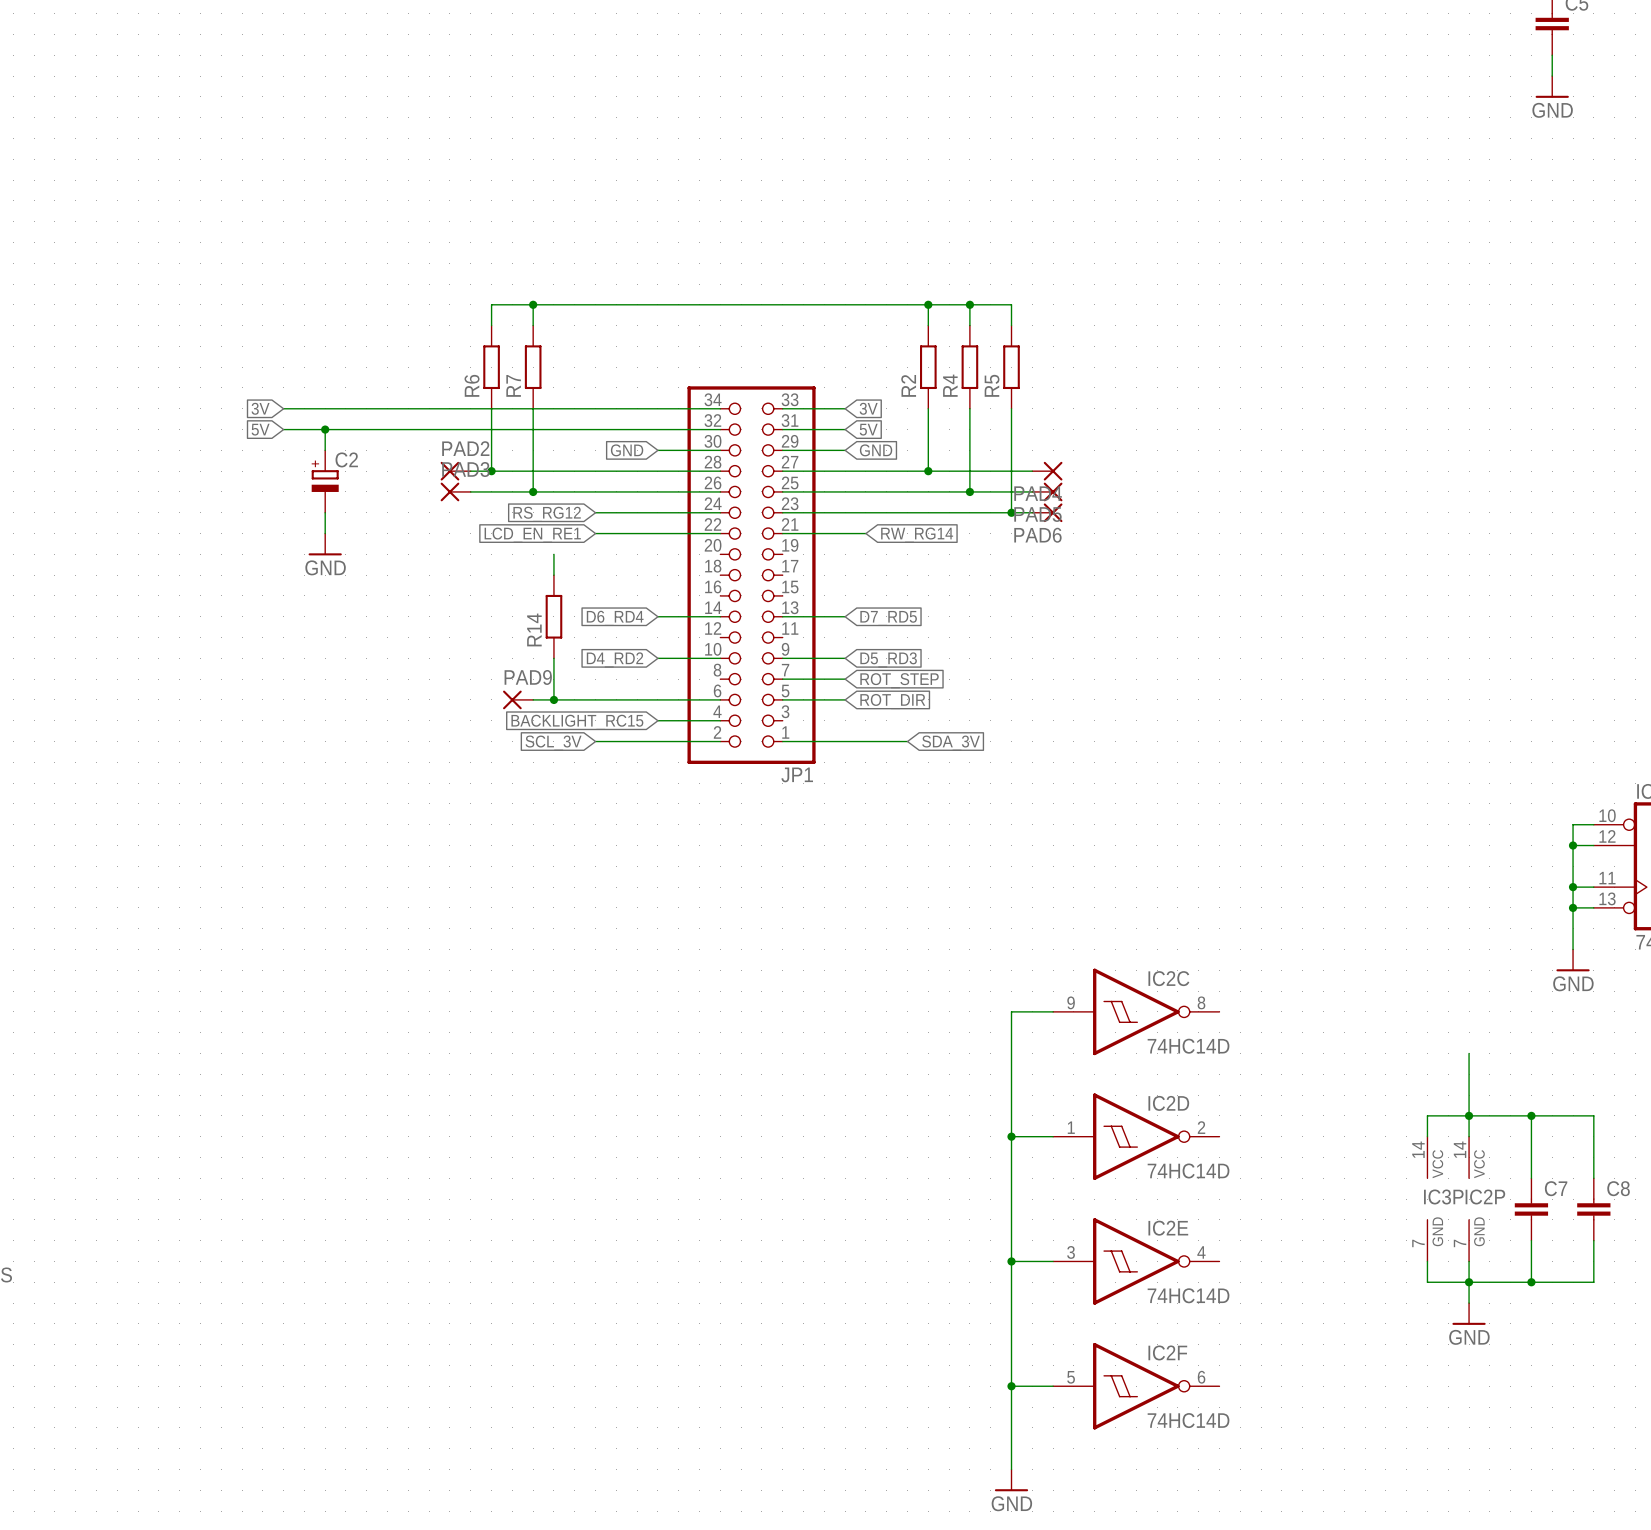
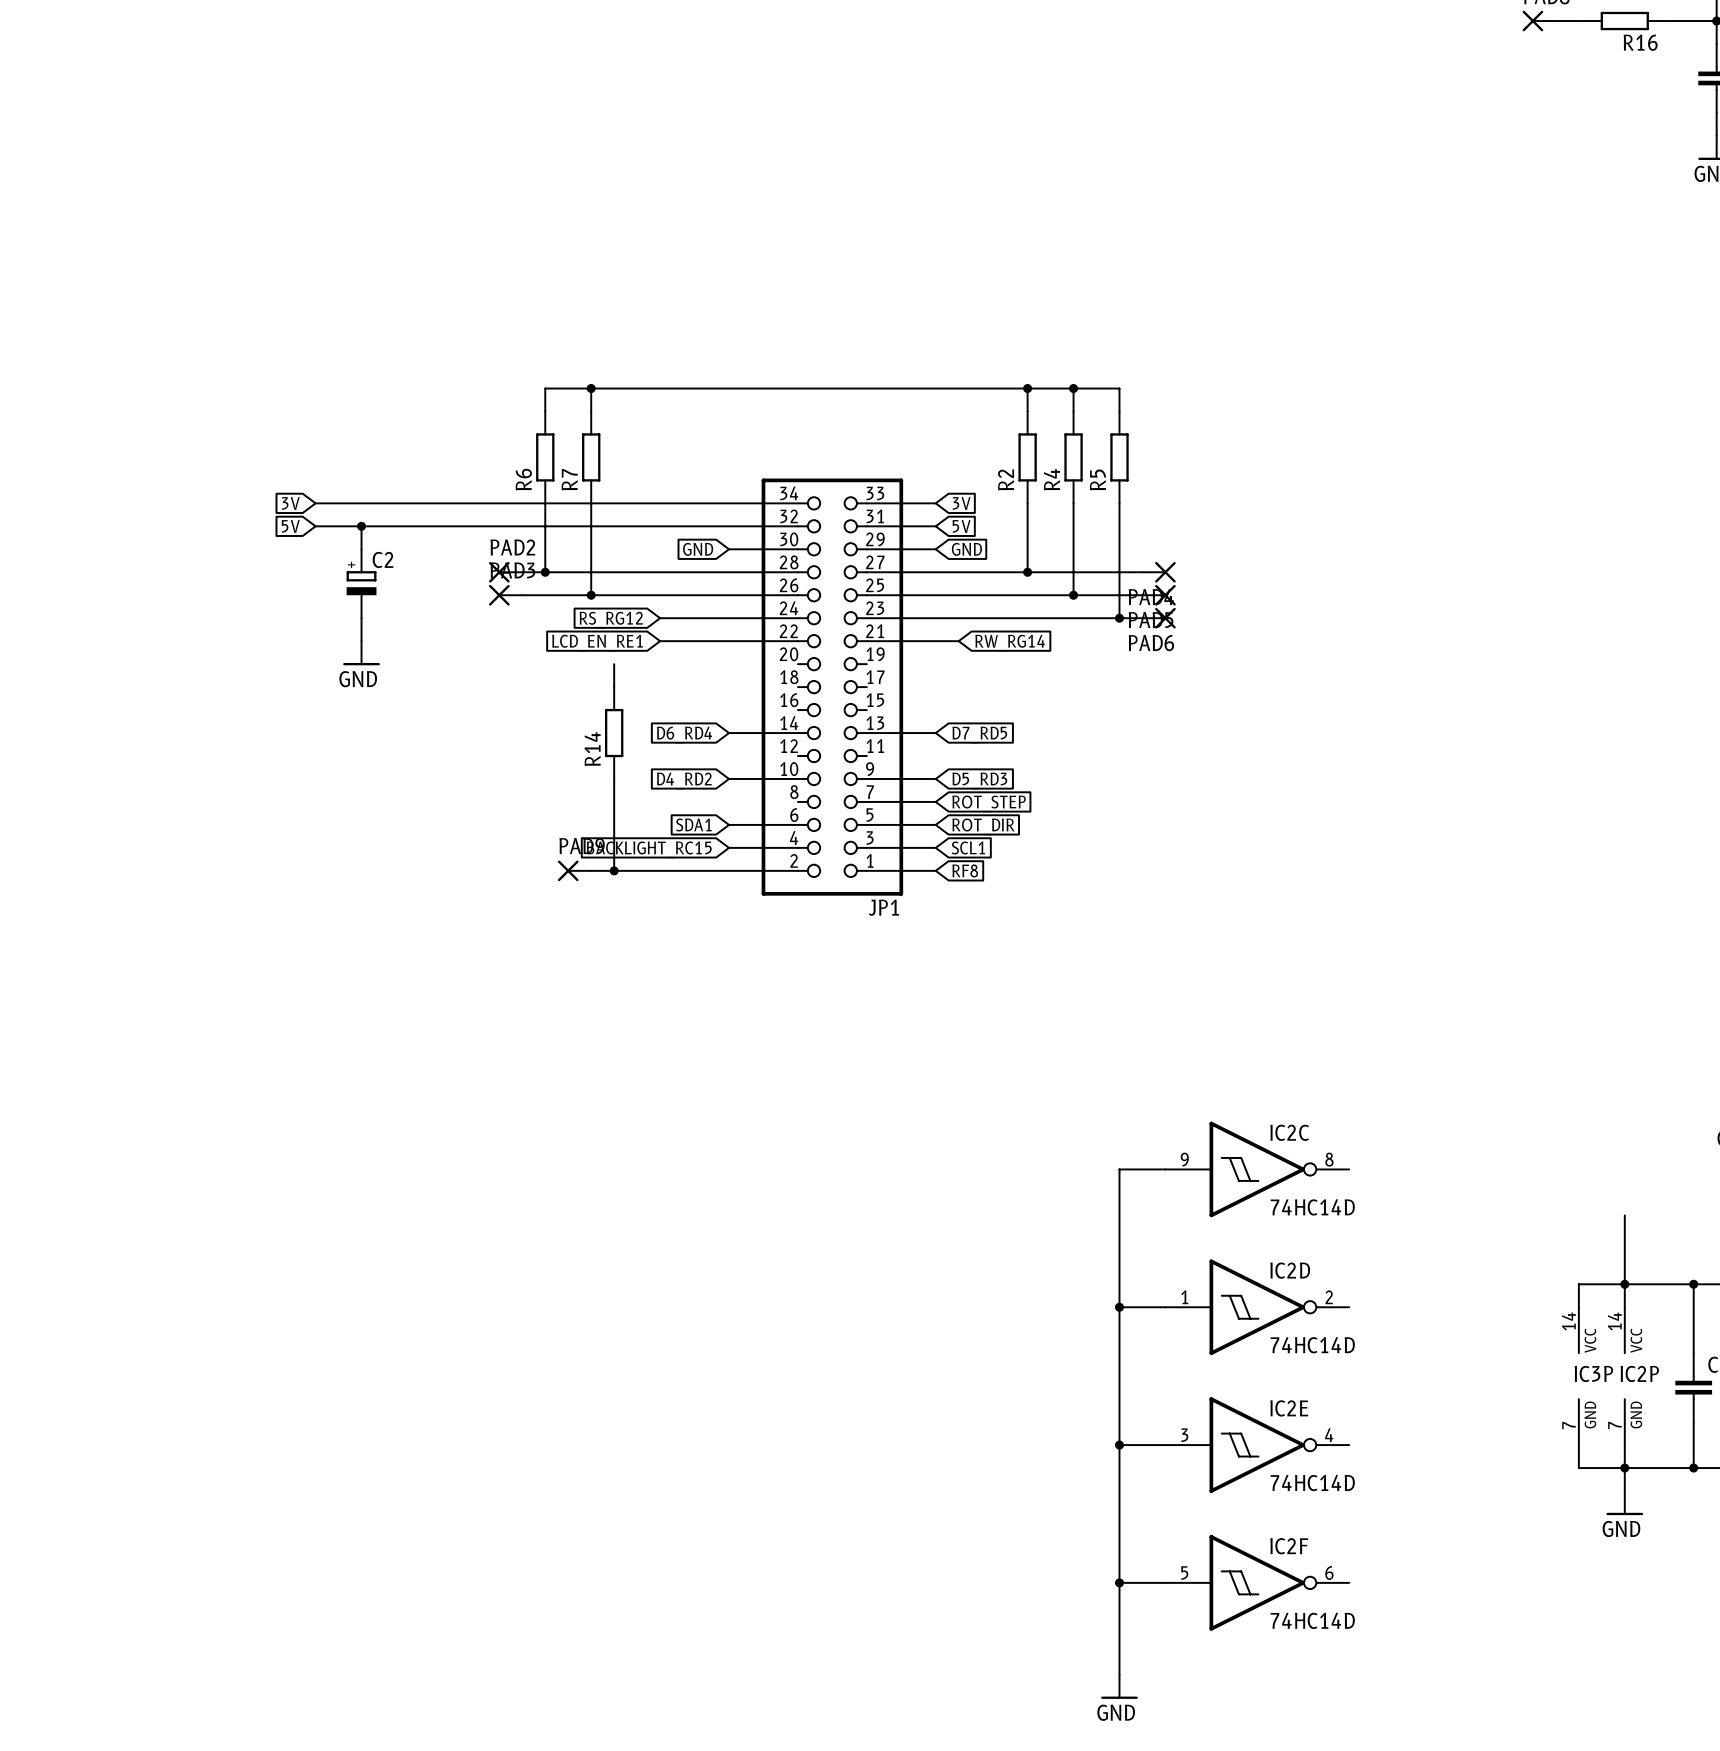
PAD9 position: (518, 699) -> (574, 870)
wire: (533, 699) (657, 699) -> none
wire: none -> (614, 824) (614, 870)
junction position: (553, 699) -> (614, 870)
global label: none -> SDA1 (693, 824)
global label: none -> SCL1 (968, 847)
wire: none -> (591, 870) (660, 870)
wire: (845, 741) (907, 741) -> (866, 847) (935, 847)
global label: none -> RF8 (965, 870)
global label: SCL_3V (553, 743) -> none
global label: SDA_3V (951, 743) -> none

